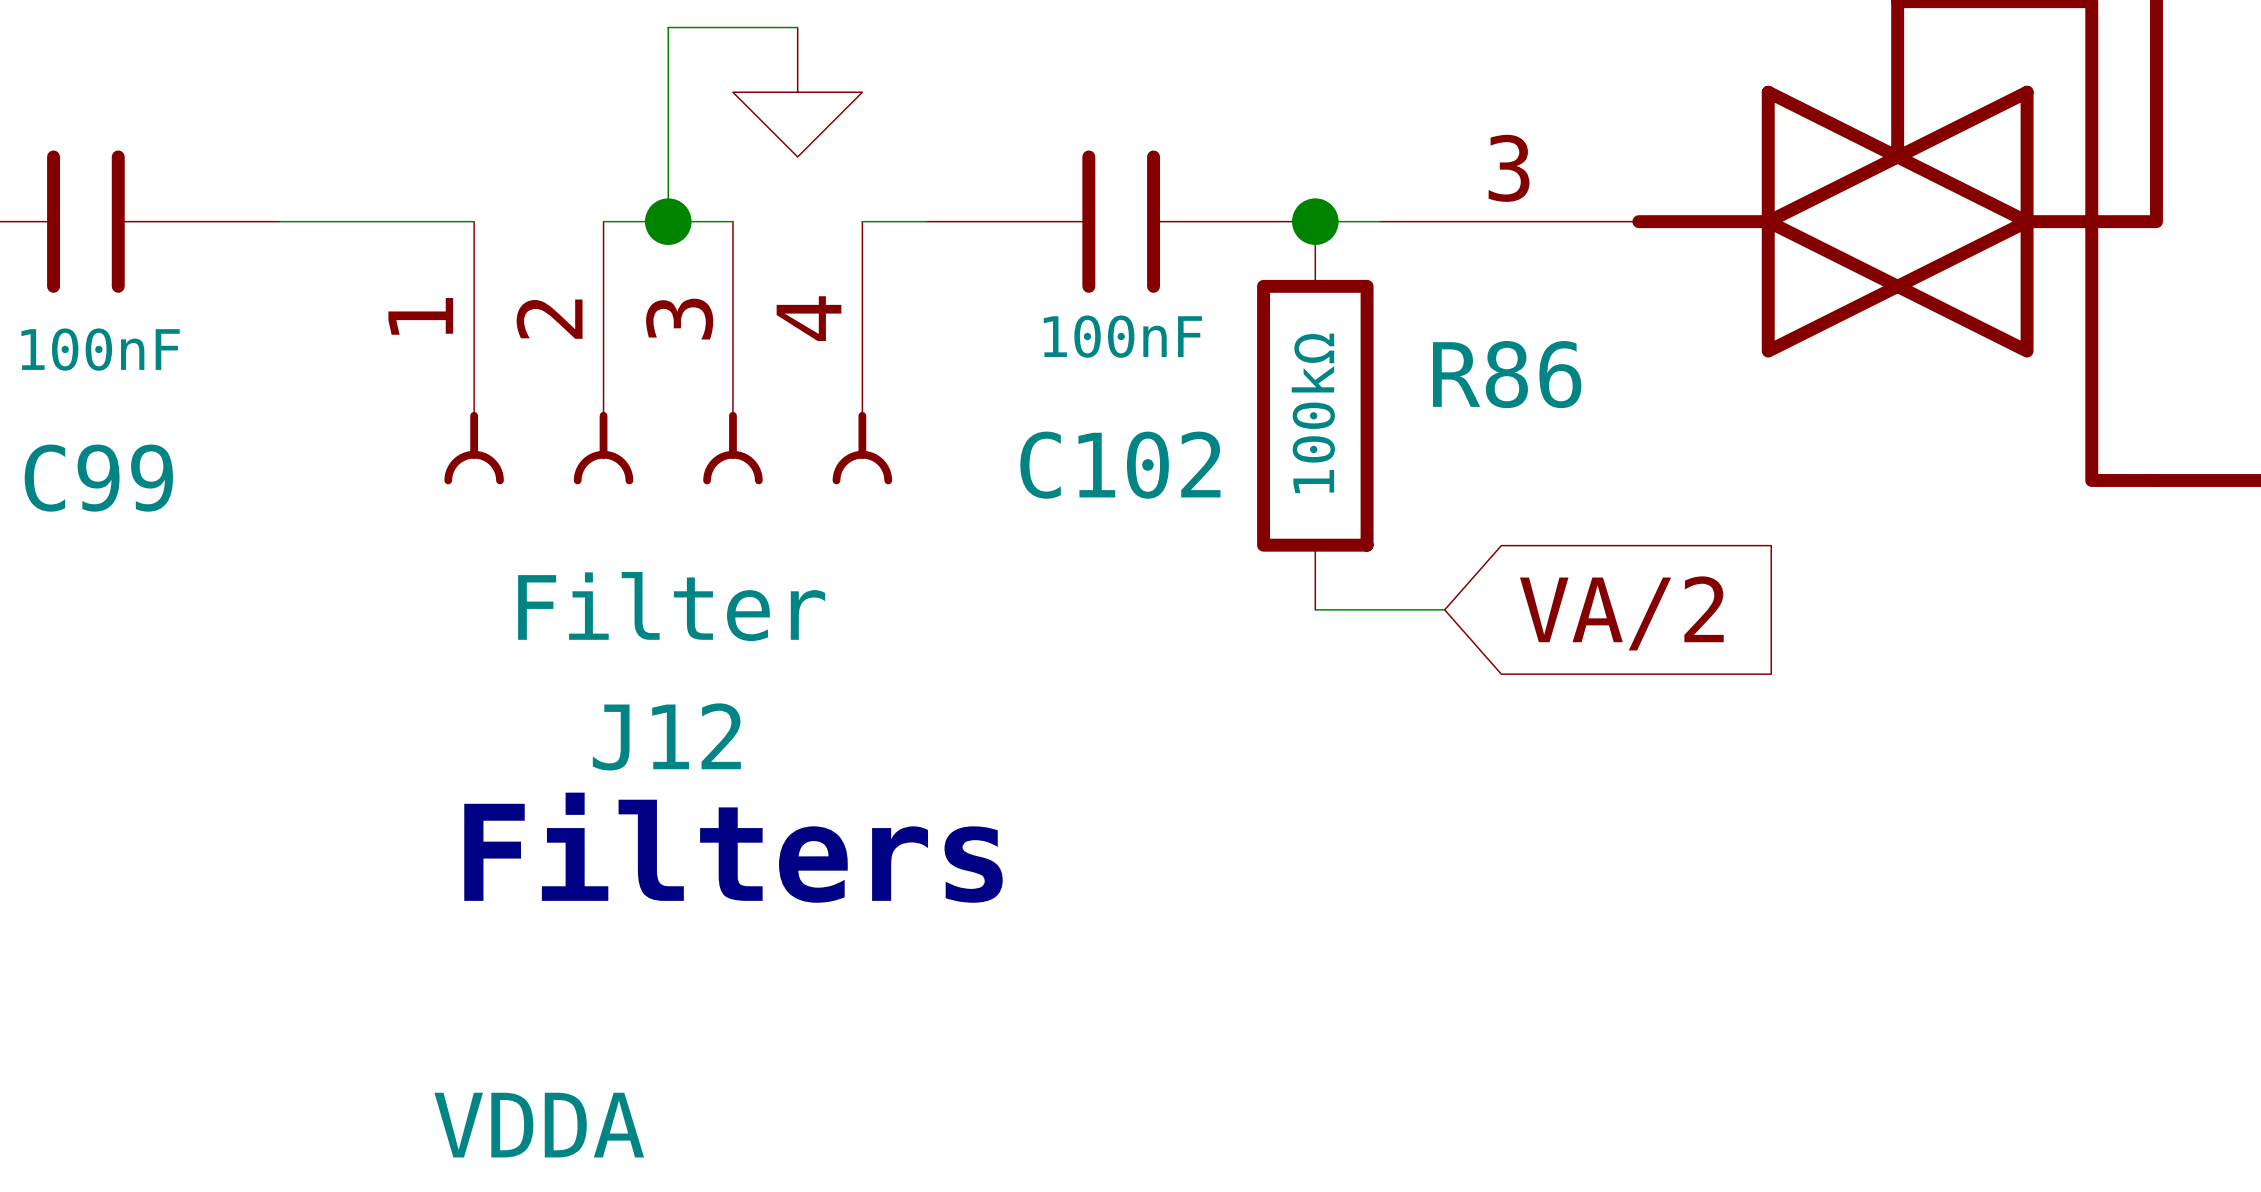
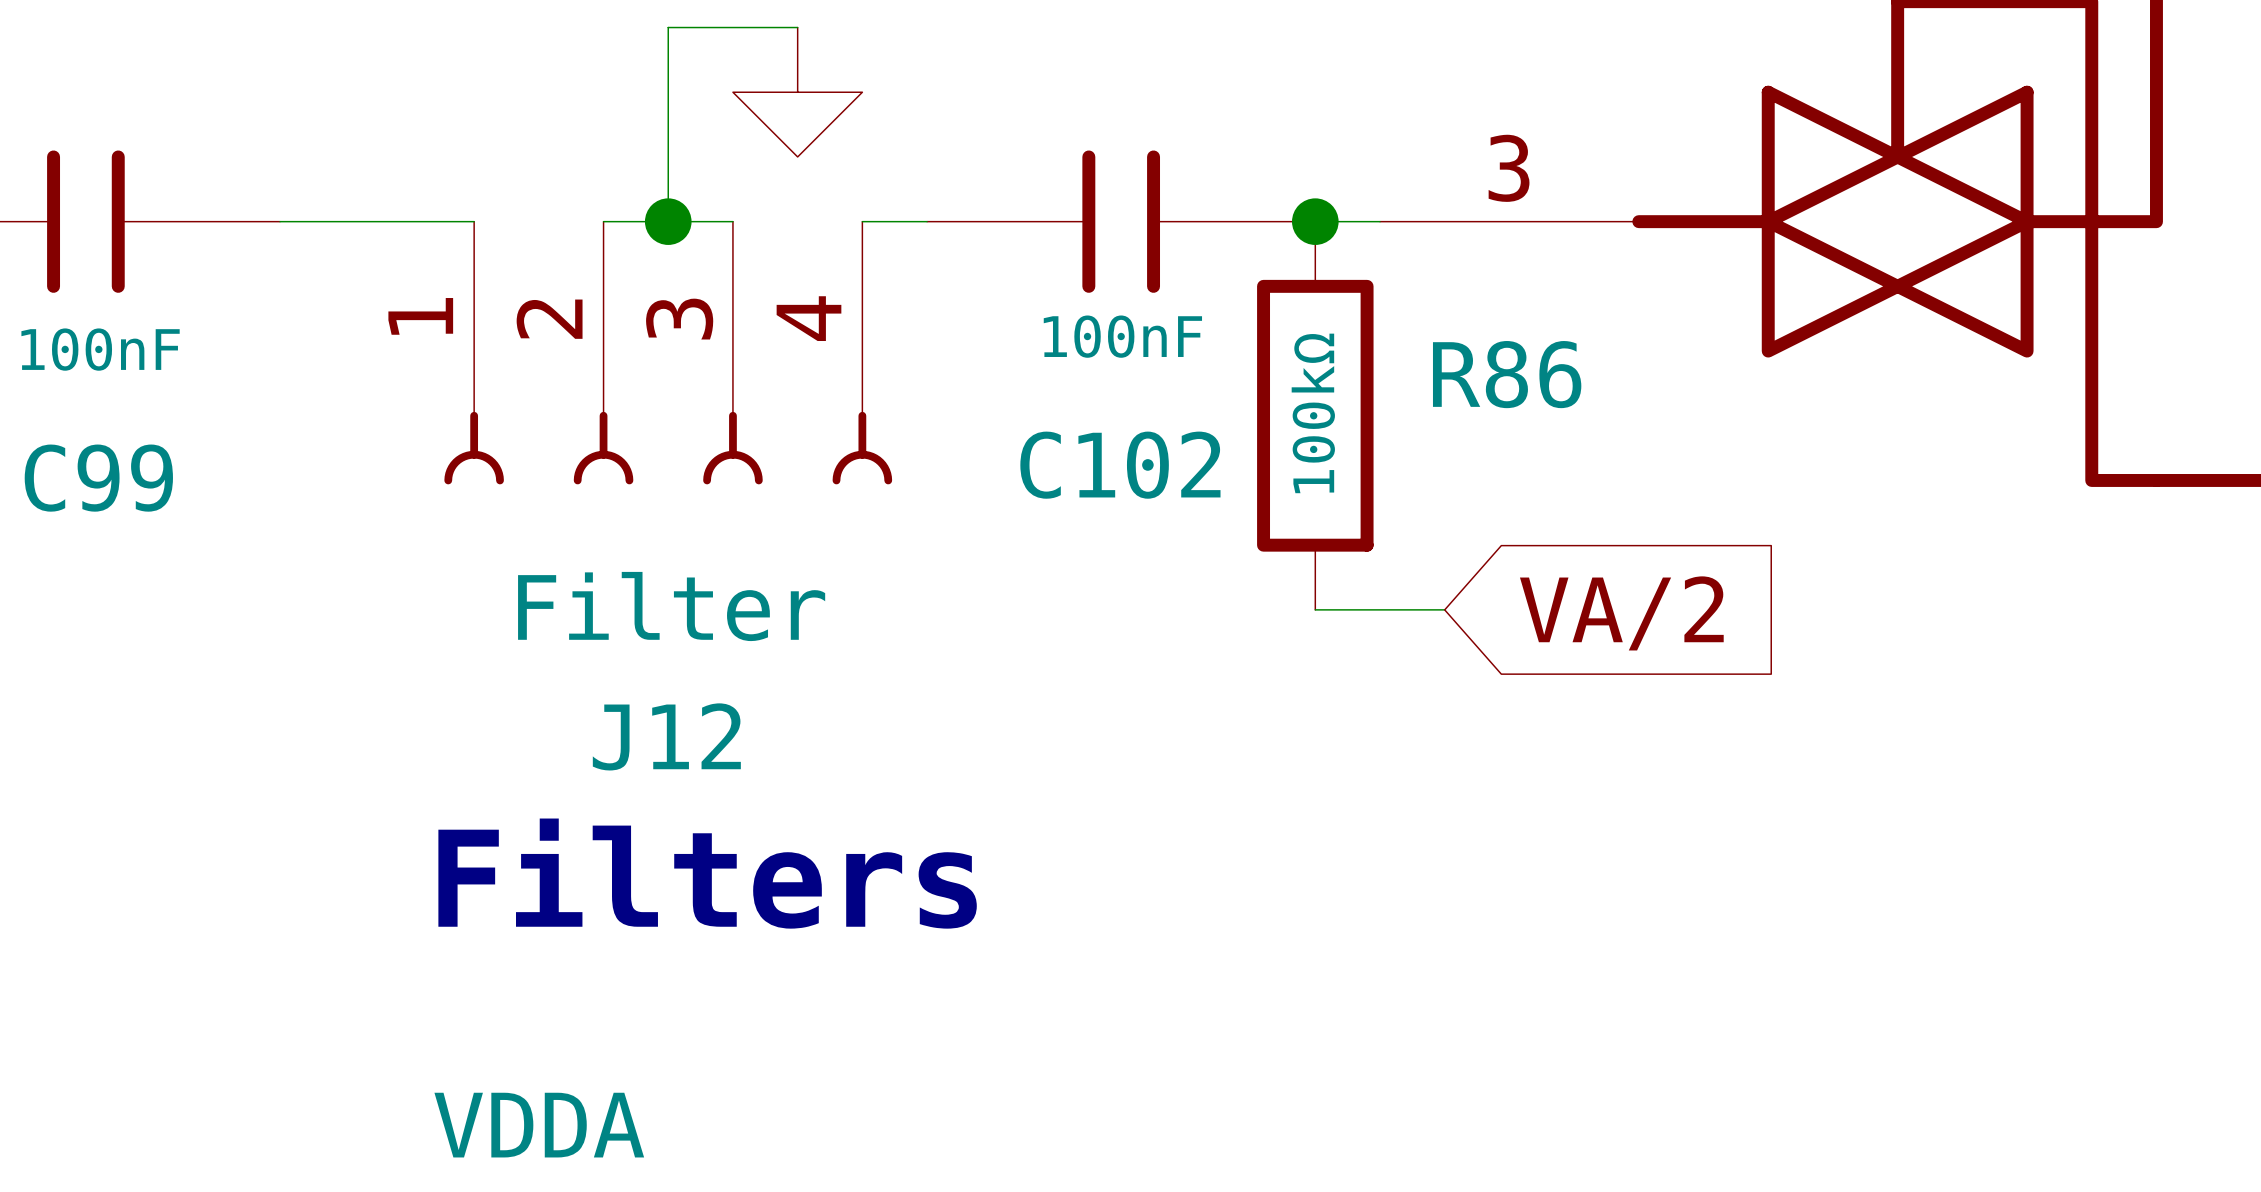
text position: Filters (733, 847) -> Filters (707, 873)

